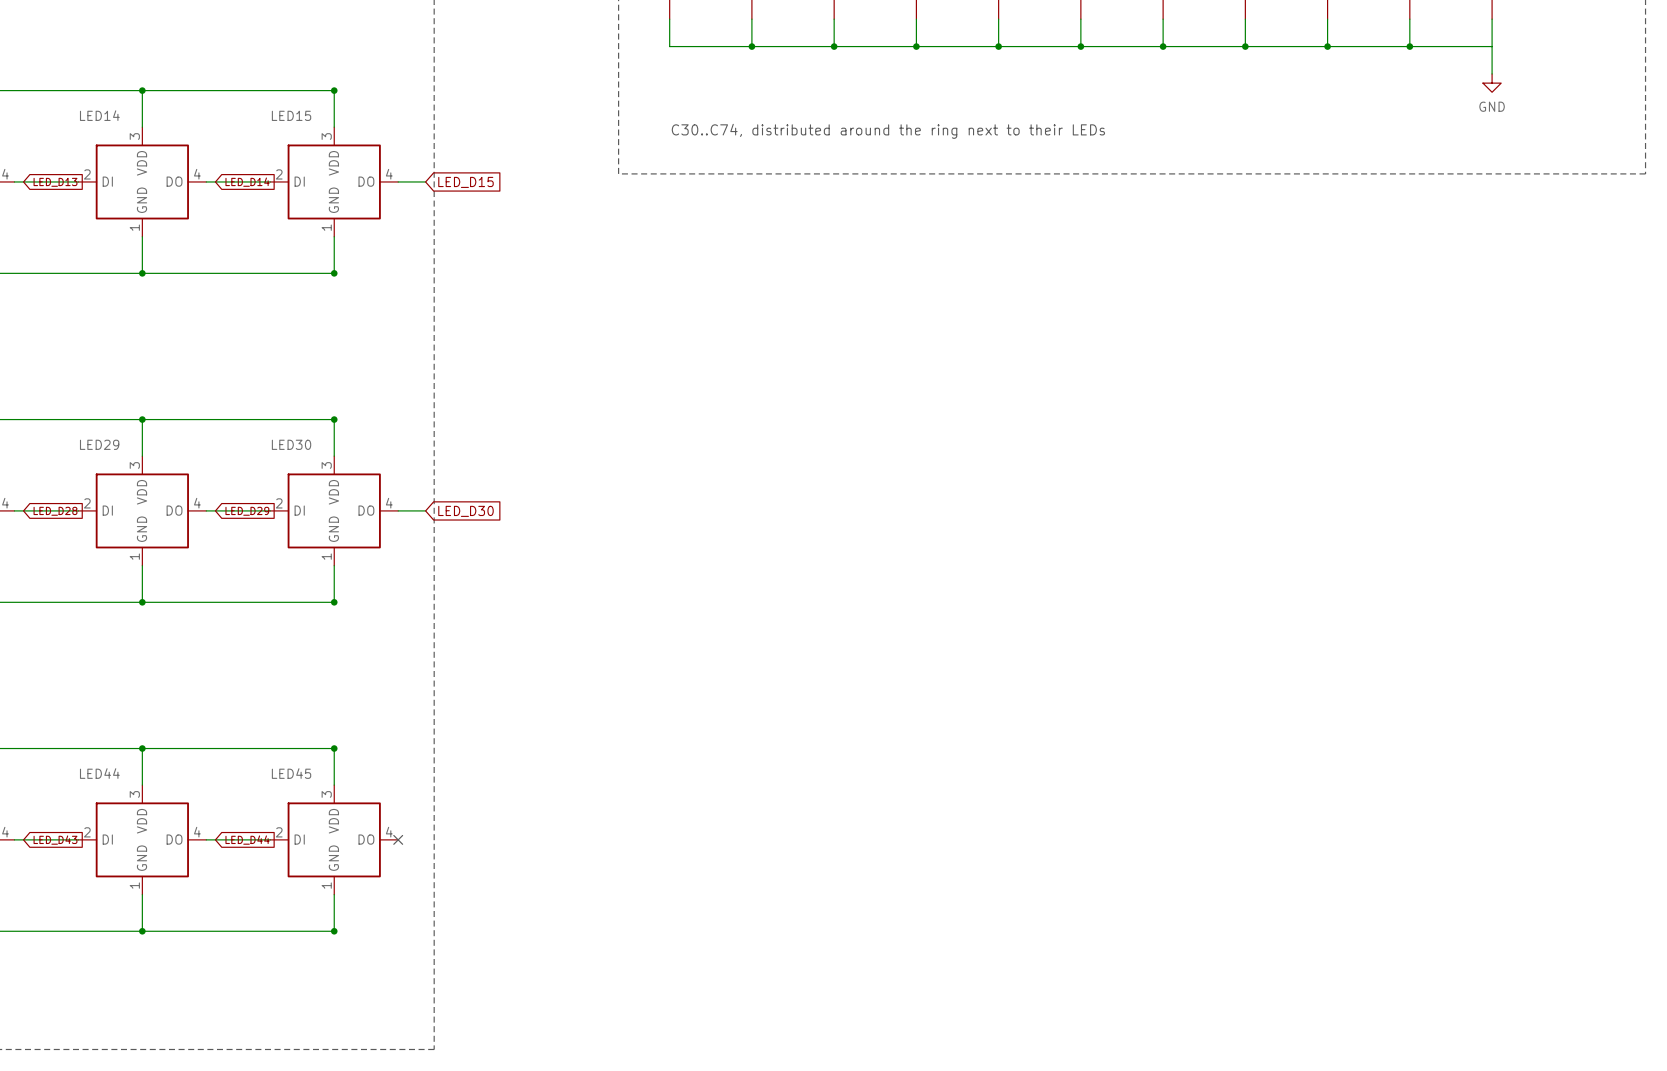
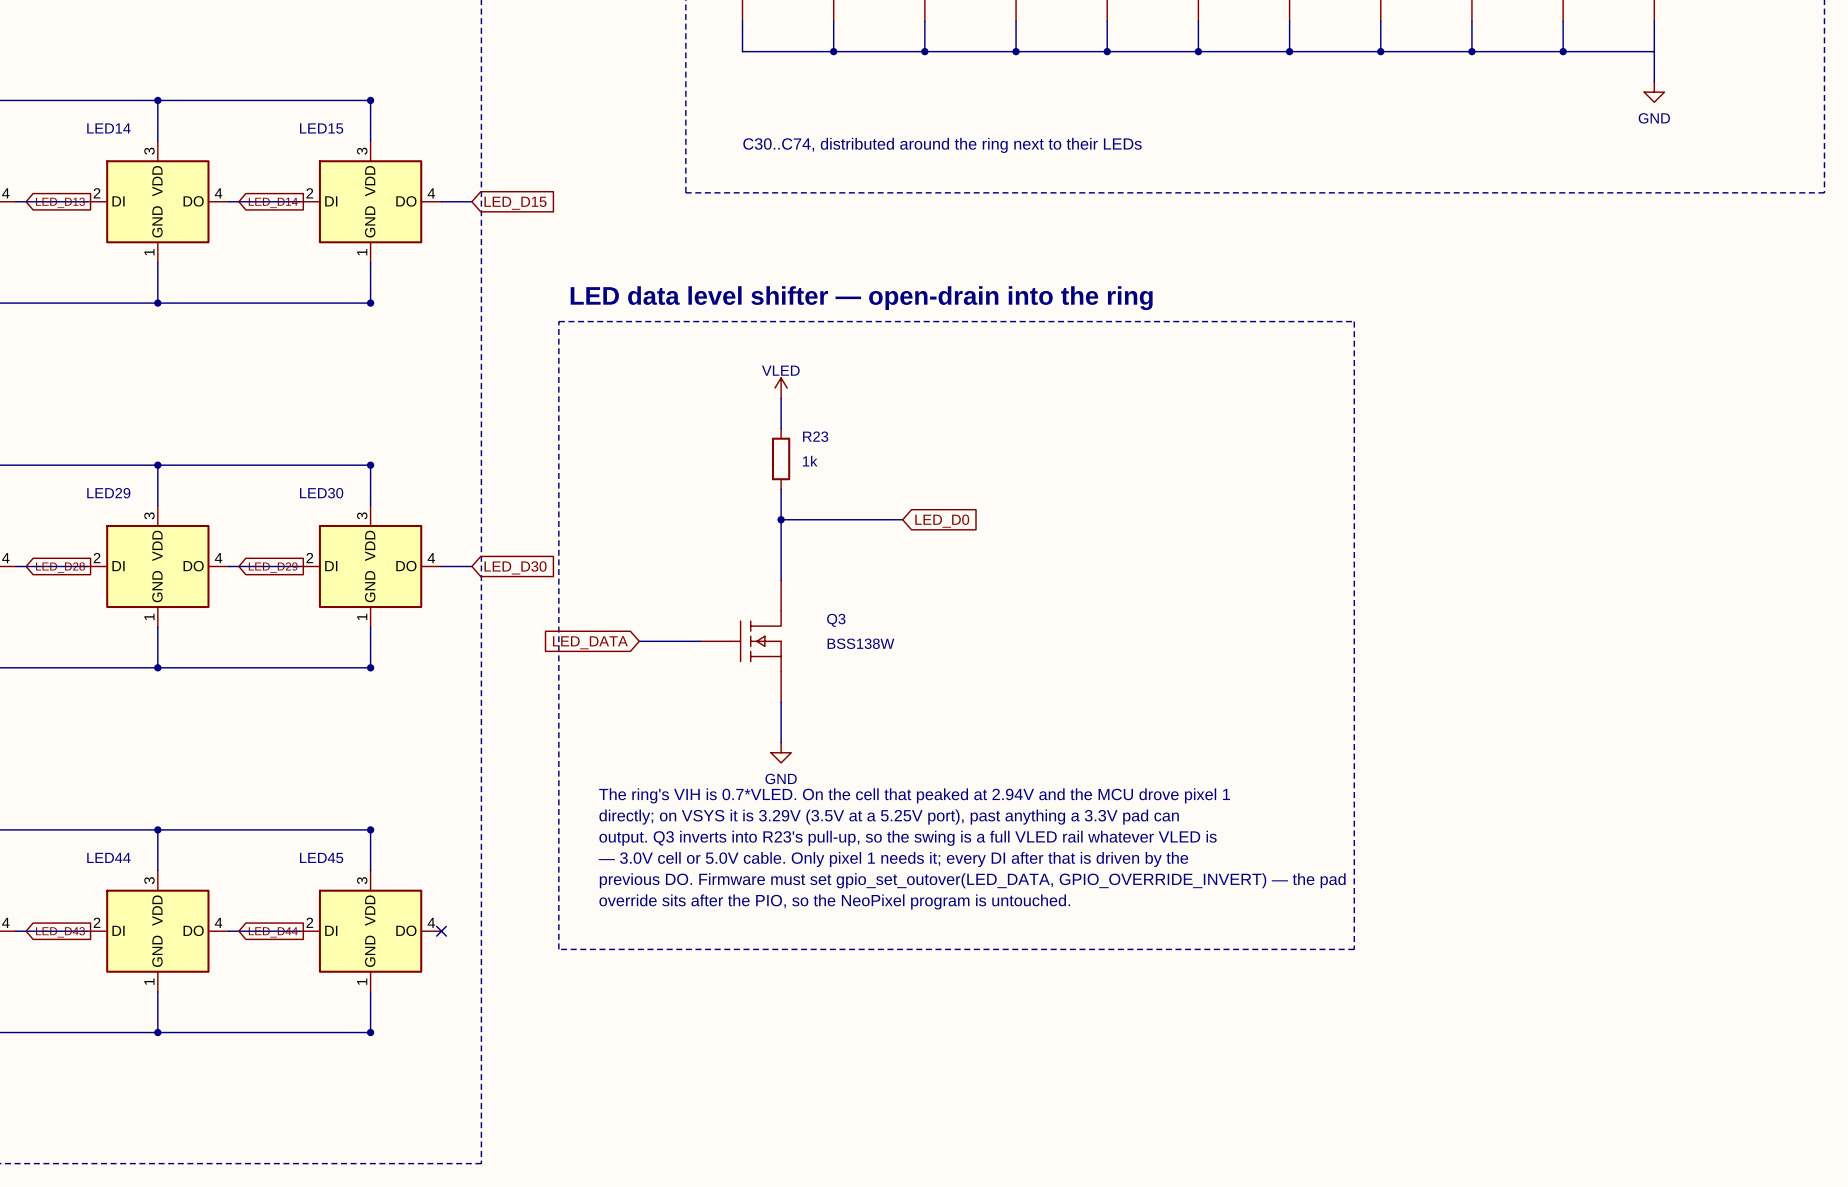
text: none -> LED data level shifter — open-drain into the ring (861, 298)
line: none -> (558, 321) (1354, 321) (1354, 949) (558, 949) (558, 321)
power symbol: none -> VLED (781, 388)
wire: none -> (781, 398) (781, 428)
R23: none -> 1k (781, 458)
wire: none -> (781, 489) (781, 580)
wire: none -> (781, 519) (902, 519)
junction: none -> (781, 519)
global label: none -> LED_D0 (942, 521)
global label: none -> LED_DATA (590, 642)
wire: none -> (639, 641) (700, 641)
Q3: none -> BSS138W (740, 641)
wire: none -> (781, 702) (781, 742)
power symbol: none -> GND (781, 752)
text: none -> The ring's VIH is 0.7*VLED. On the cell that peaked at 2.94V and the MCU drove pixel 1 (914, 795)
text: none -> directly; on VSYS it is 3.29V (3.5V at a 5.25V port), past anything a 3.3V pad can (889, 817)
text: none -> output. Q3 inverts into R23's pull-up, so the swing is a full VLED rail whatever VLED is (908, 838)
text: none -> — 3.0V cell or 5.0V cable. Only pixel 1 needs it; every DI after that is driven by the (893, 859)
text: none -> previous DO. Firmware must set gpio_set_outover(LED_DATA, GPIO_OVERRIDE_INVERT) — the pad (972, 880)
text: none -> override sits after the PIO, so the NeoPixel program is untouched. (834, 901)

